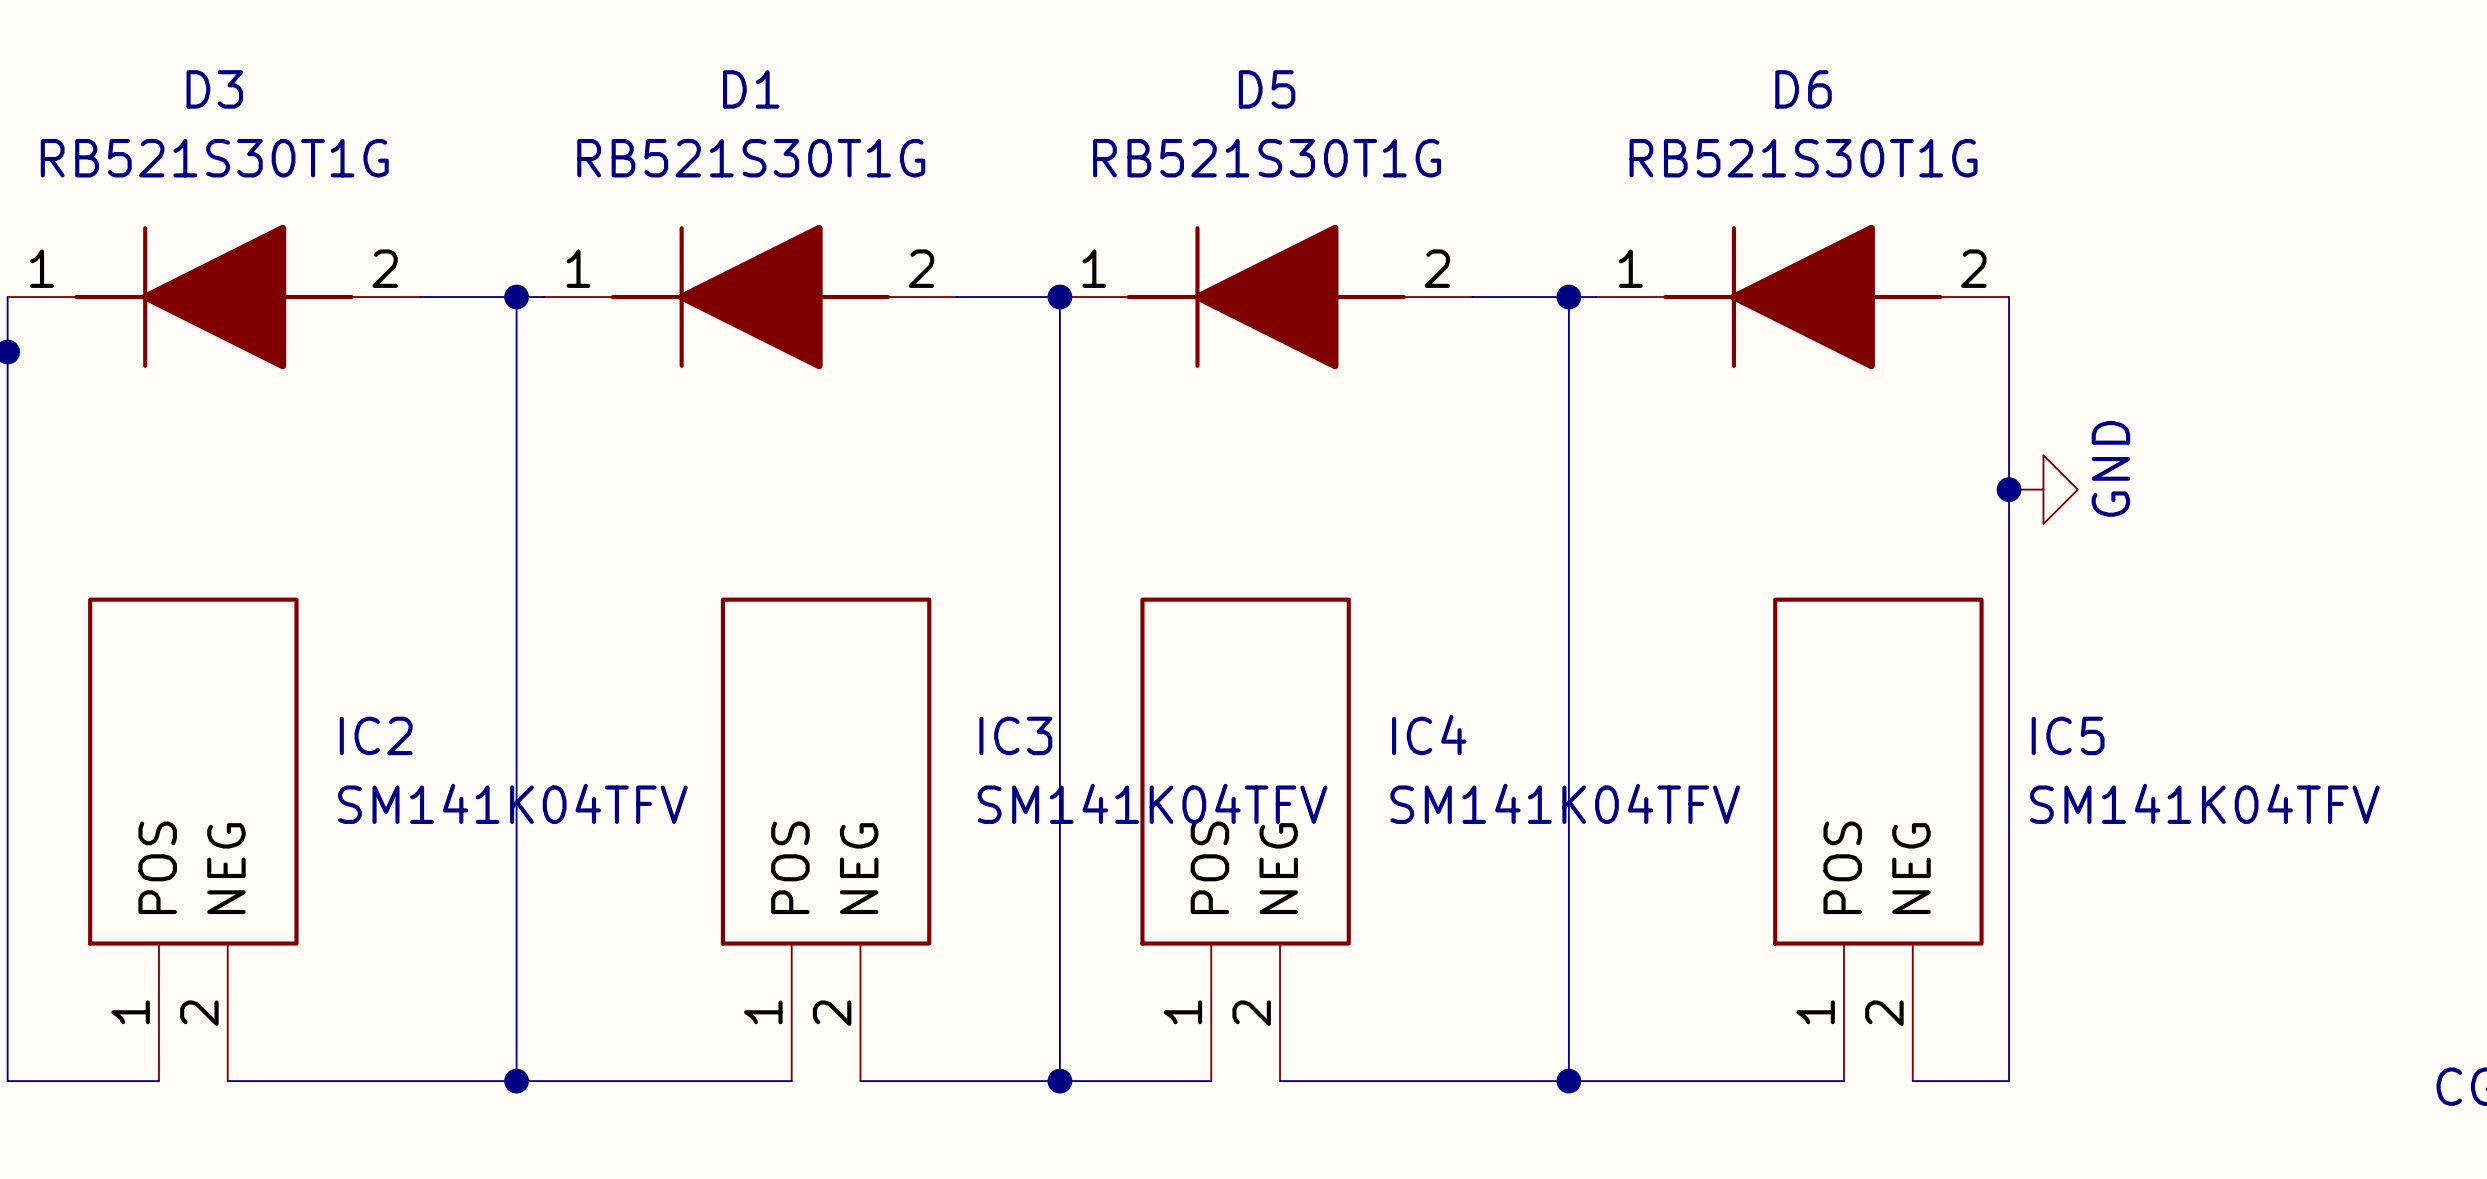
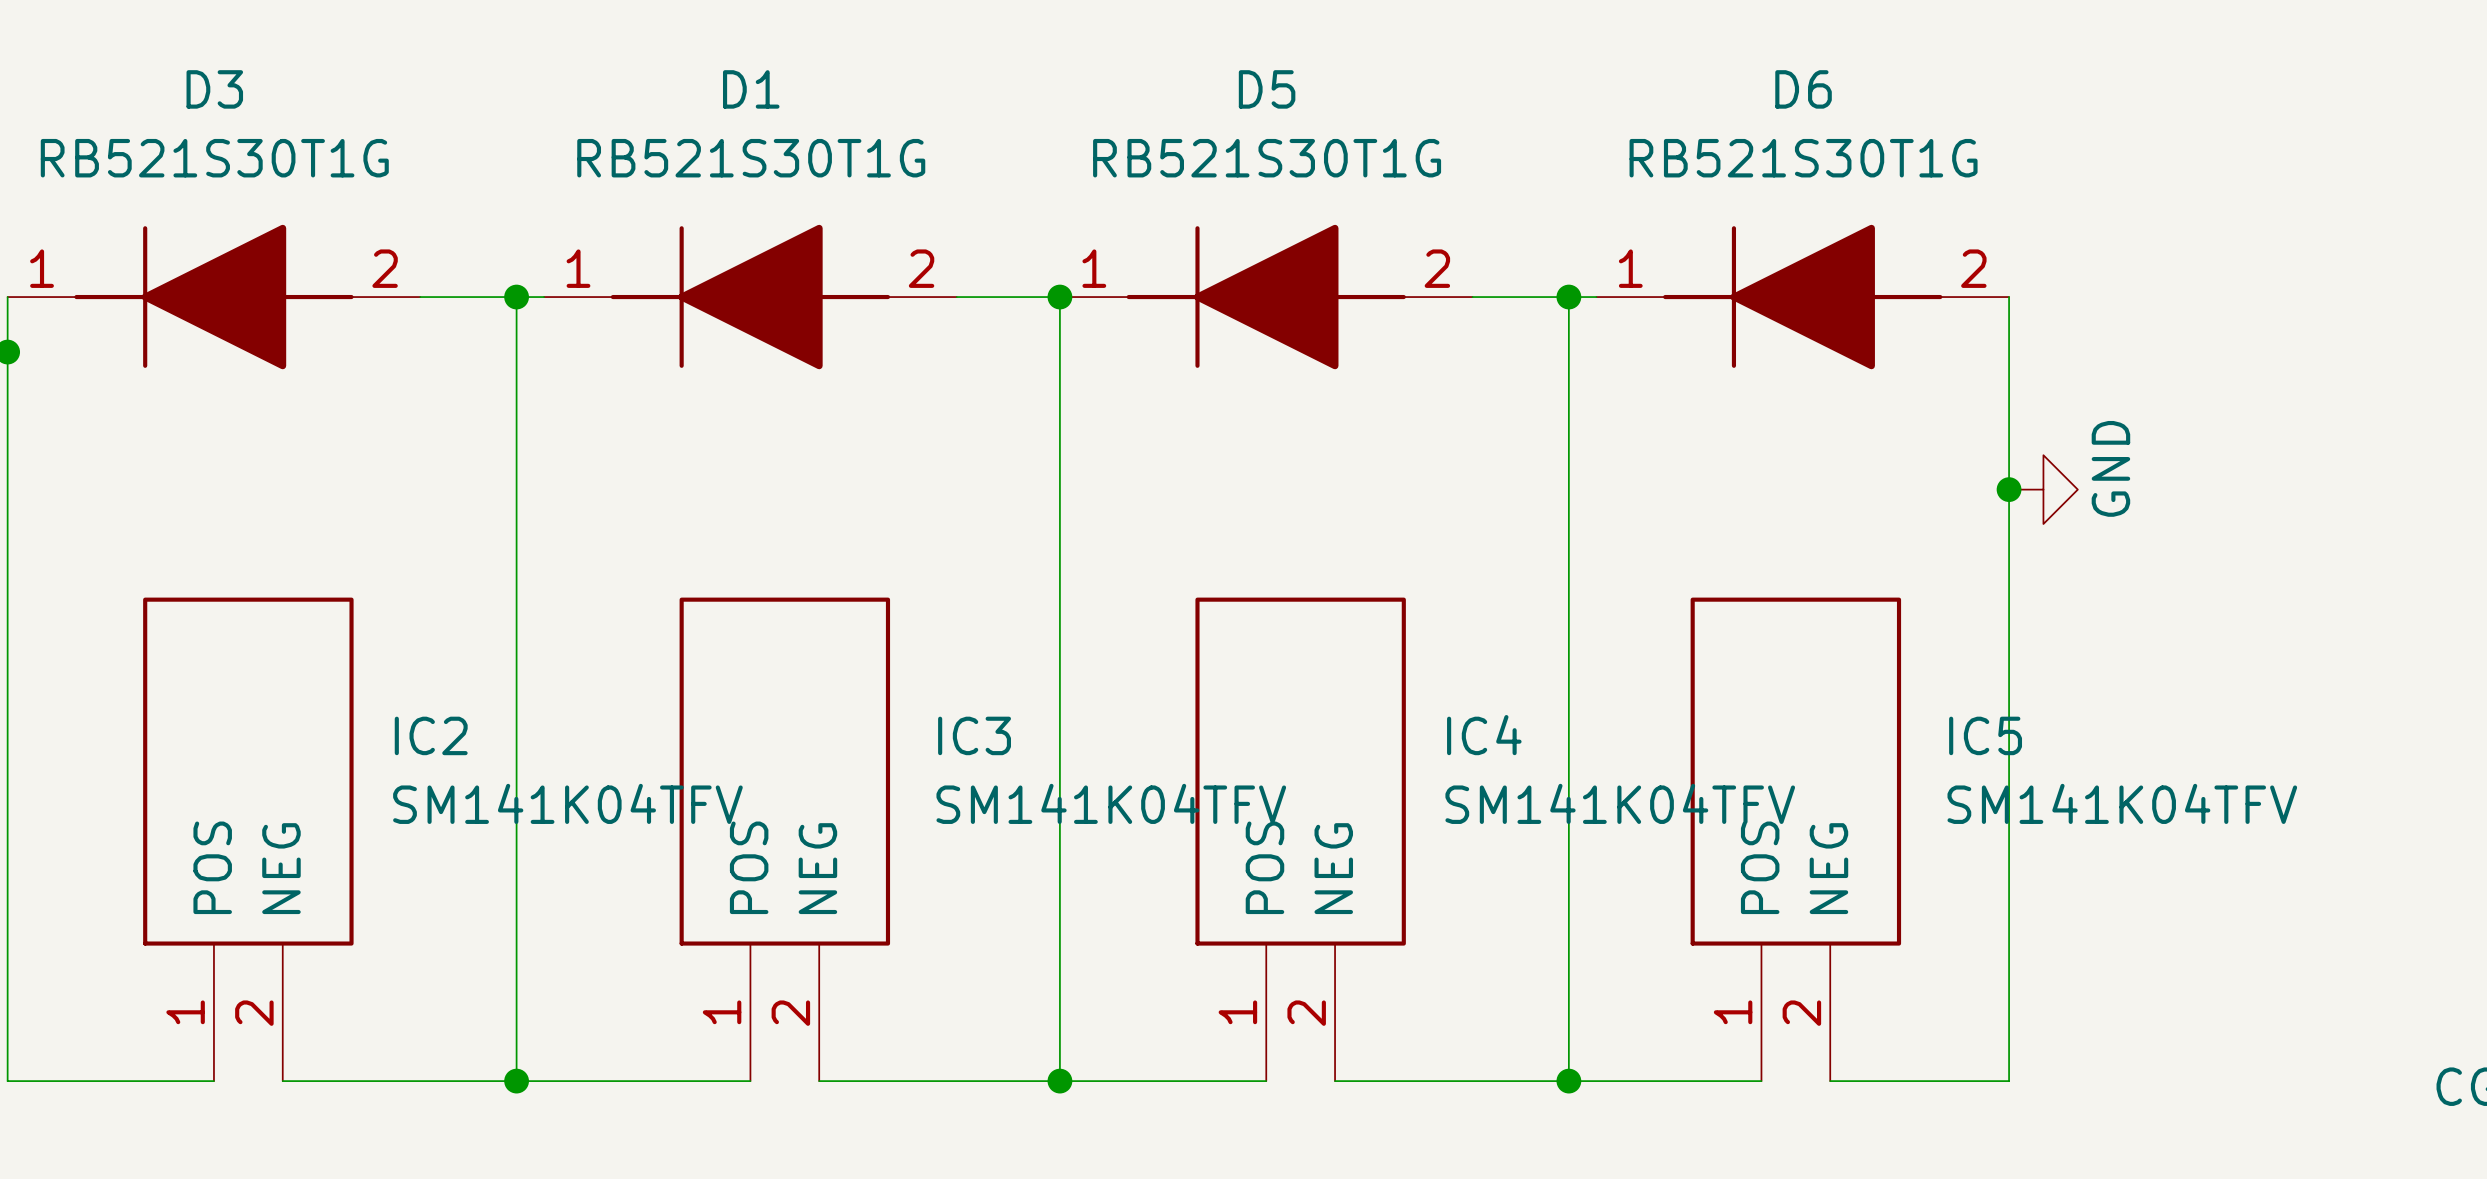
IC2 position: (193, 839) -> (248, 839)
IC3 position: (826, 839) -> (784, 839)
IC4 position: (1245, 839) -> (1300, 839)
IC5 position: (1878, 839) -> (1795, 839)
wire: (227, 1081) (282, 1081) -> (158, 1081) (213, 1081)
wire: (750, 1081) (791, 1081) -> (819, 1081) (860, 1081)
wire: (1280, 1081) (1335, 1081) -> (1211, 1081) (1266, 1081)
wire: (1761, 1081) (1830, 1081) -> (1843, 1081) (1912, 1081)

